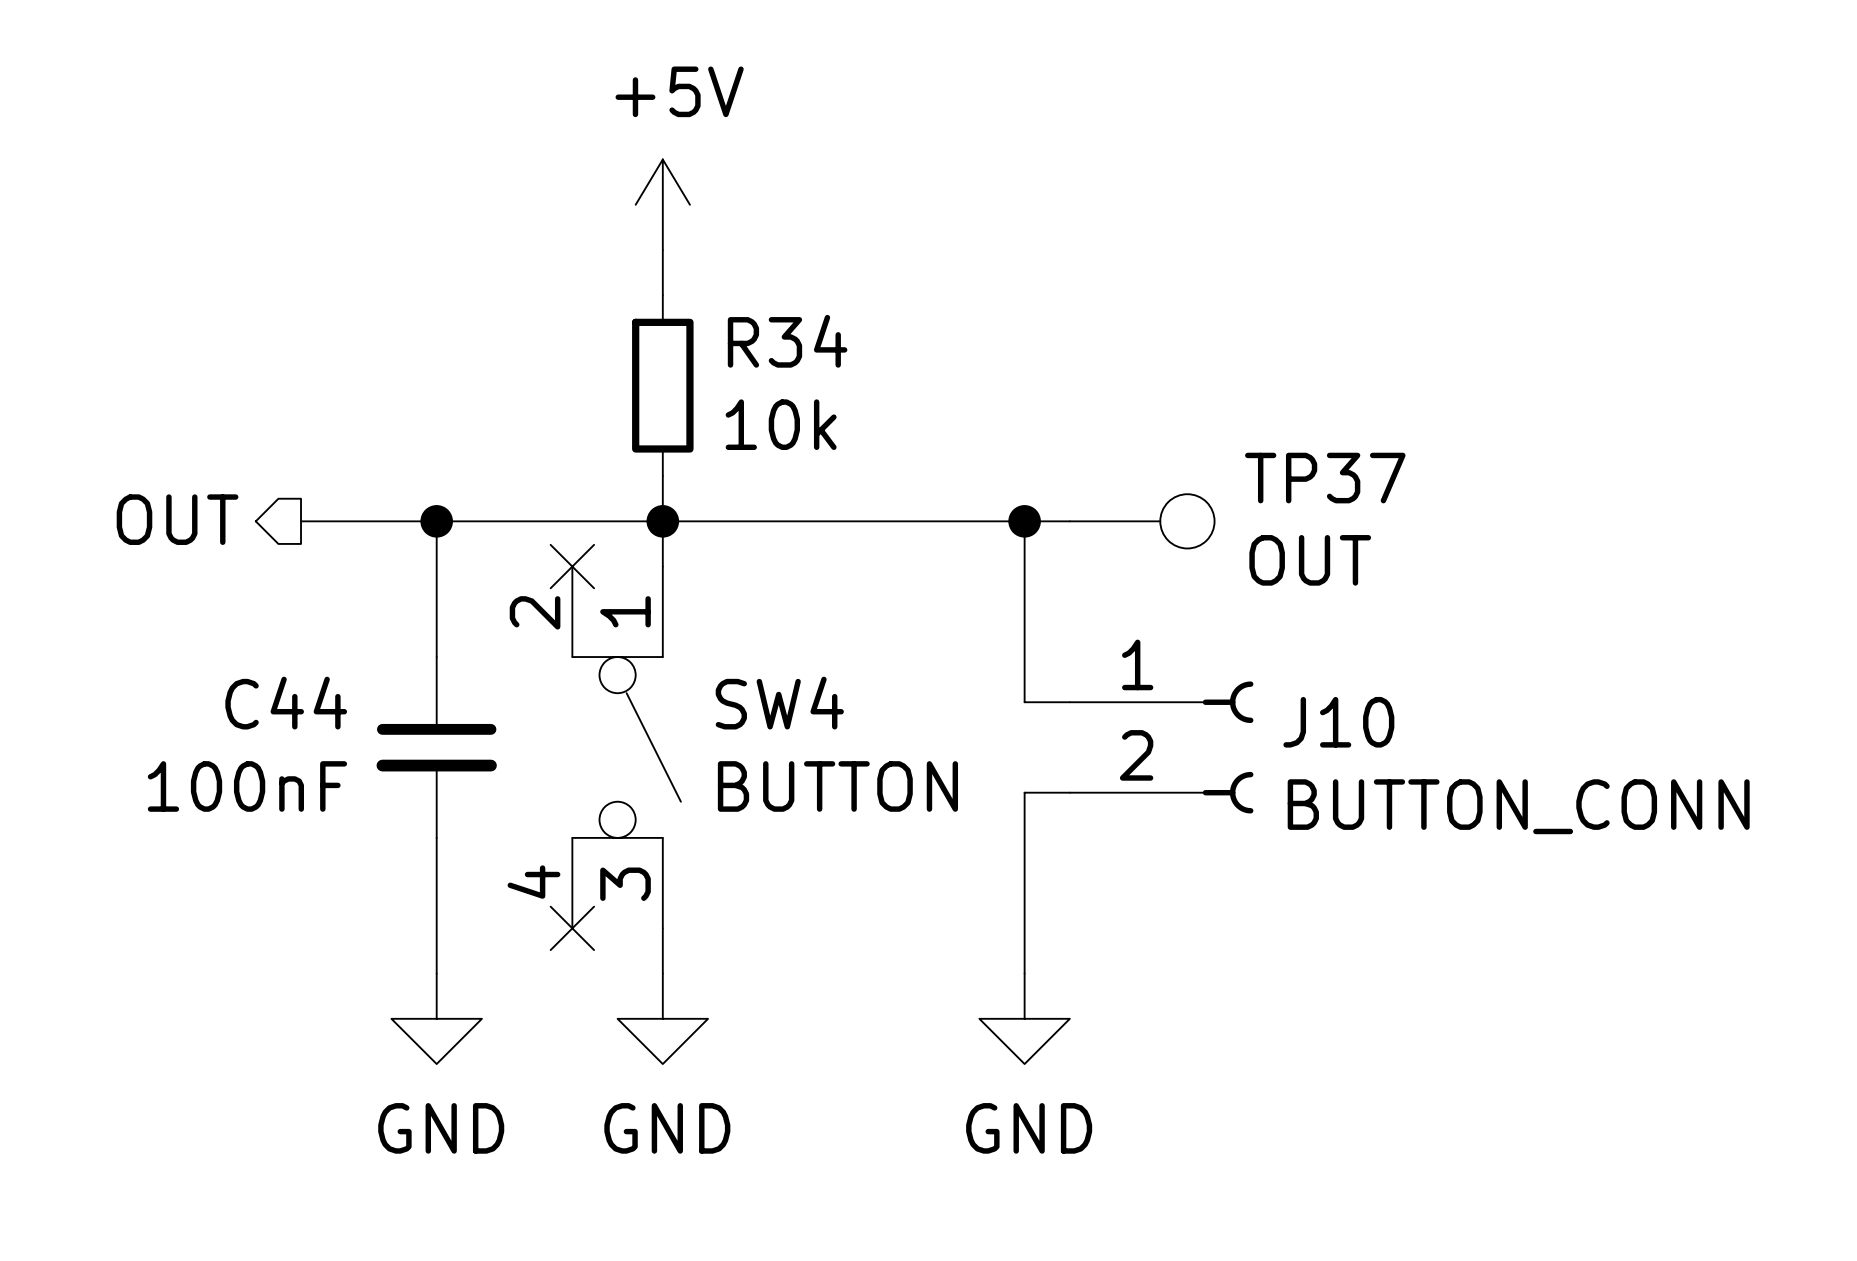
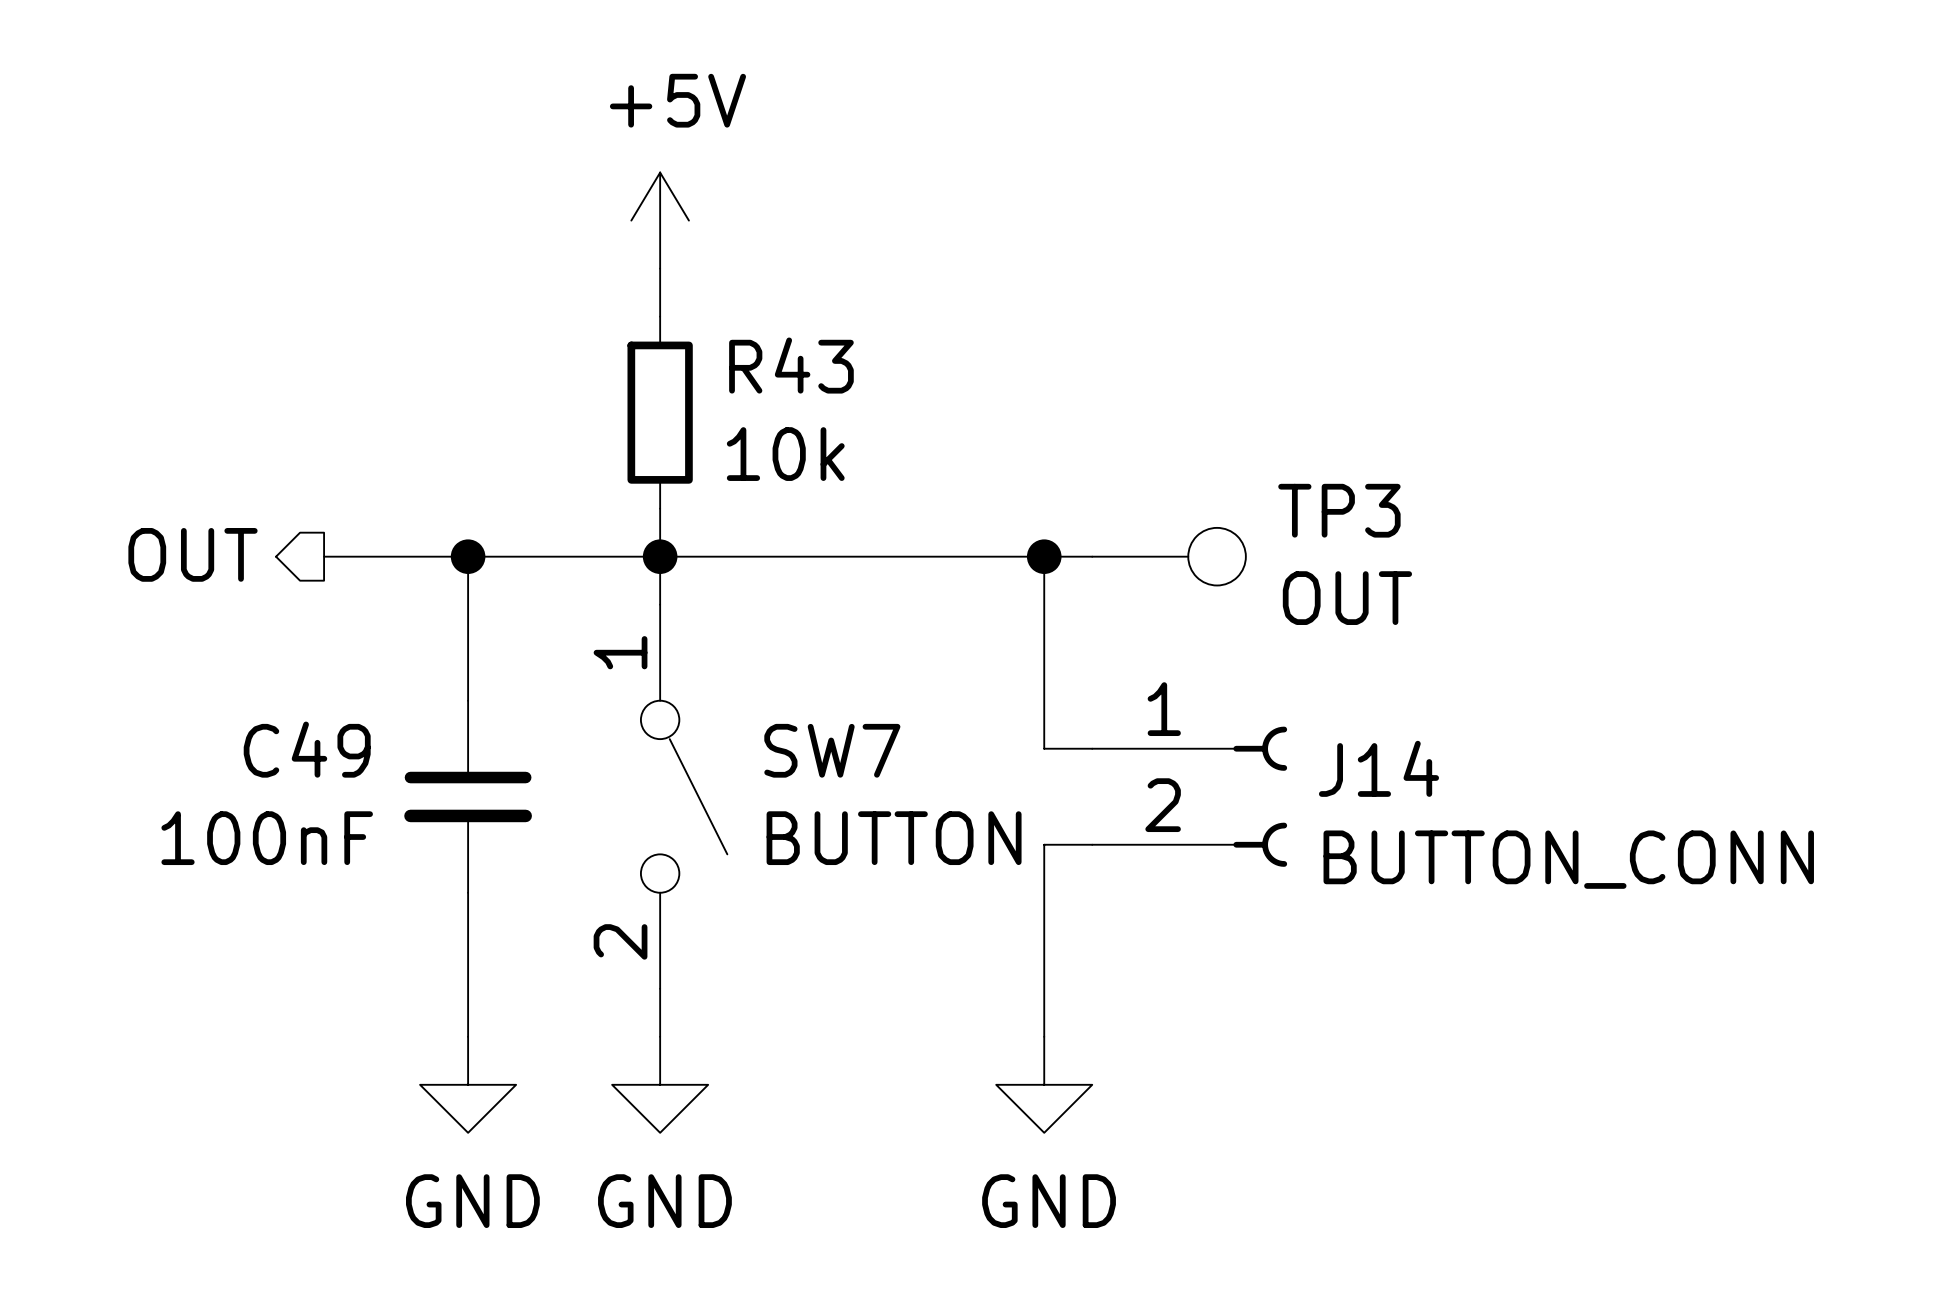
R34 name: R34 (787, 341) -> R43 (791, 365)
TP37 name: TP37 (1325, 478) -> TP3 (1339, 510)
hierarchical label position: OUT (177, 519) -> OUT (192, 554)
wire: (301, 521) (346, 521) -> none
wire: (436, 521) (436, 657) -> (468, 556) (468, 700)
junction position: (436, 521) -> (468, 556)
no-connect mark: (572, 566) -> none
J10 name: J10 (1338, 722) -> J14 (1378, 768)
C44: 100nF (436, 747) -> none
C49: none -> 100nF (468, 796)
SW4: BUTTON (626, 747) -> none
SW7: none -> BUTTON (684, 796)
wire: (436, 837) (436, 973) -> (468, 892) (468, 1036)
no-connect mark: (572, 928) -> none
power symbol position: GND (436, 1018) -> GND (468, 1084)

